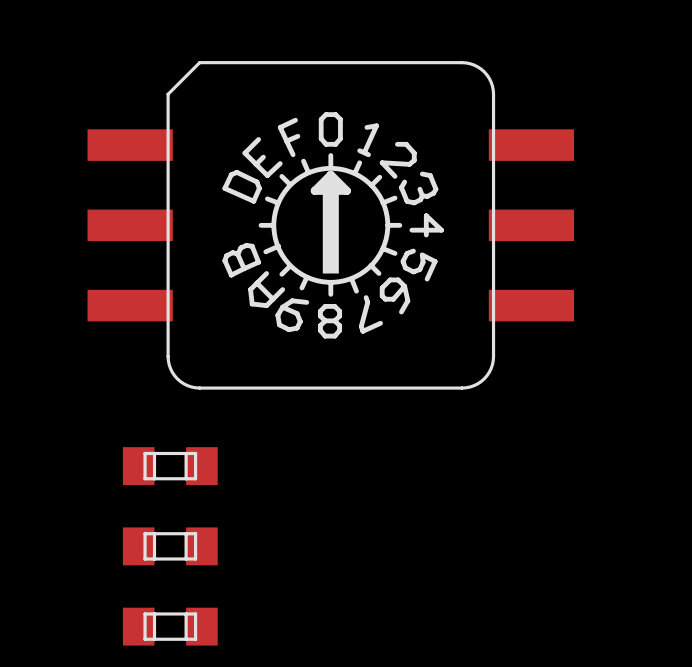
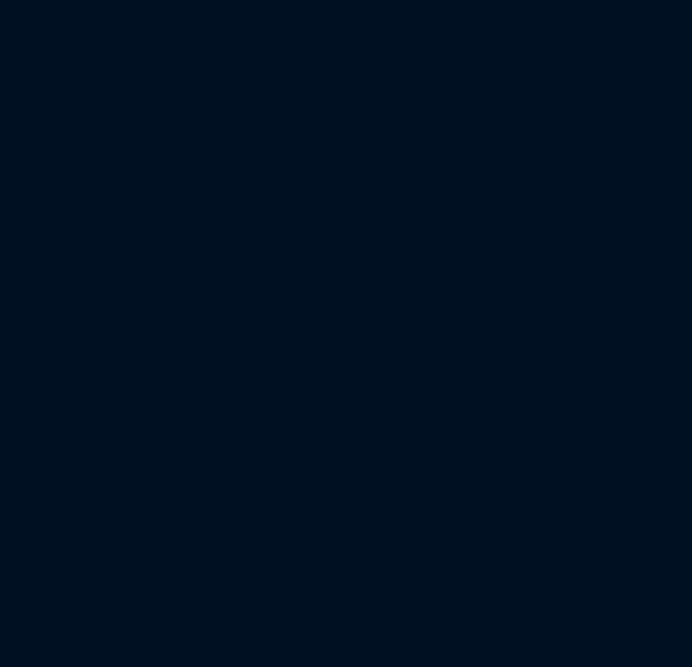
part: (330, 225) -> none
part: (170, 466) -> none
part: (170, 546) -> none
part: (170, 626) -> none

